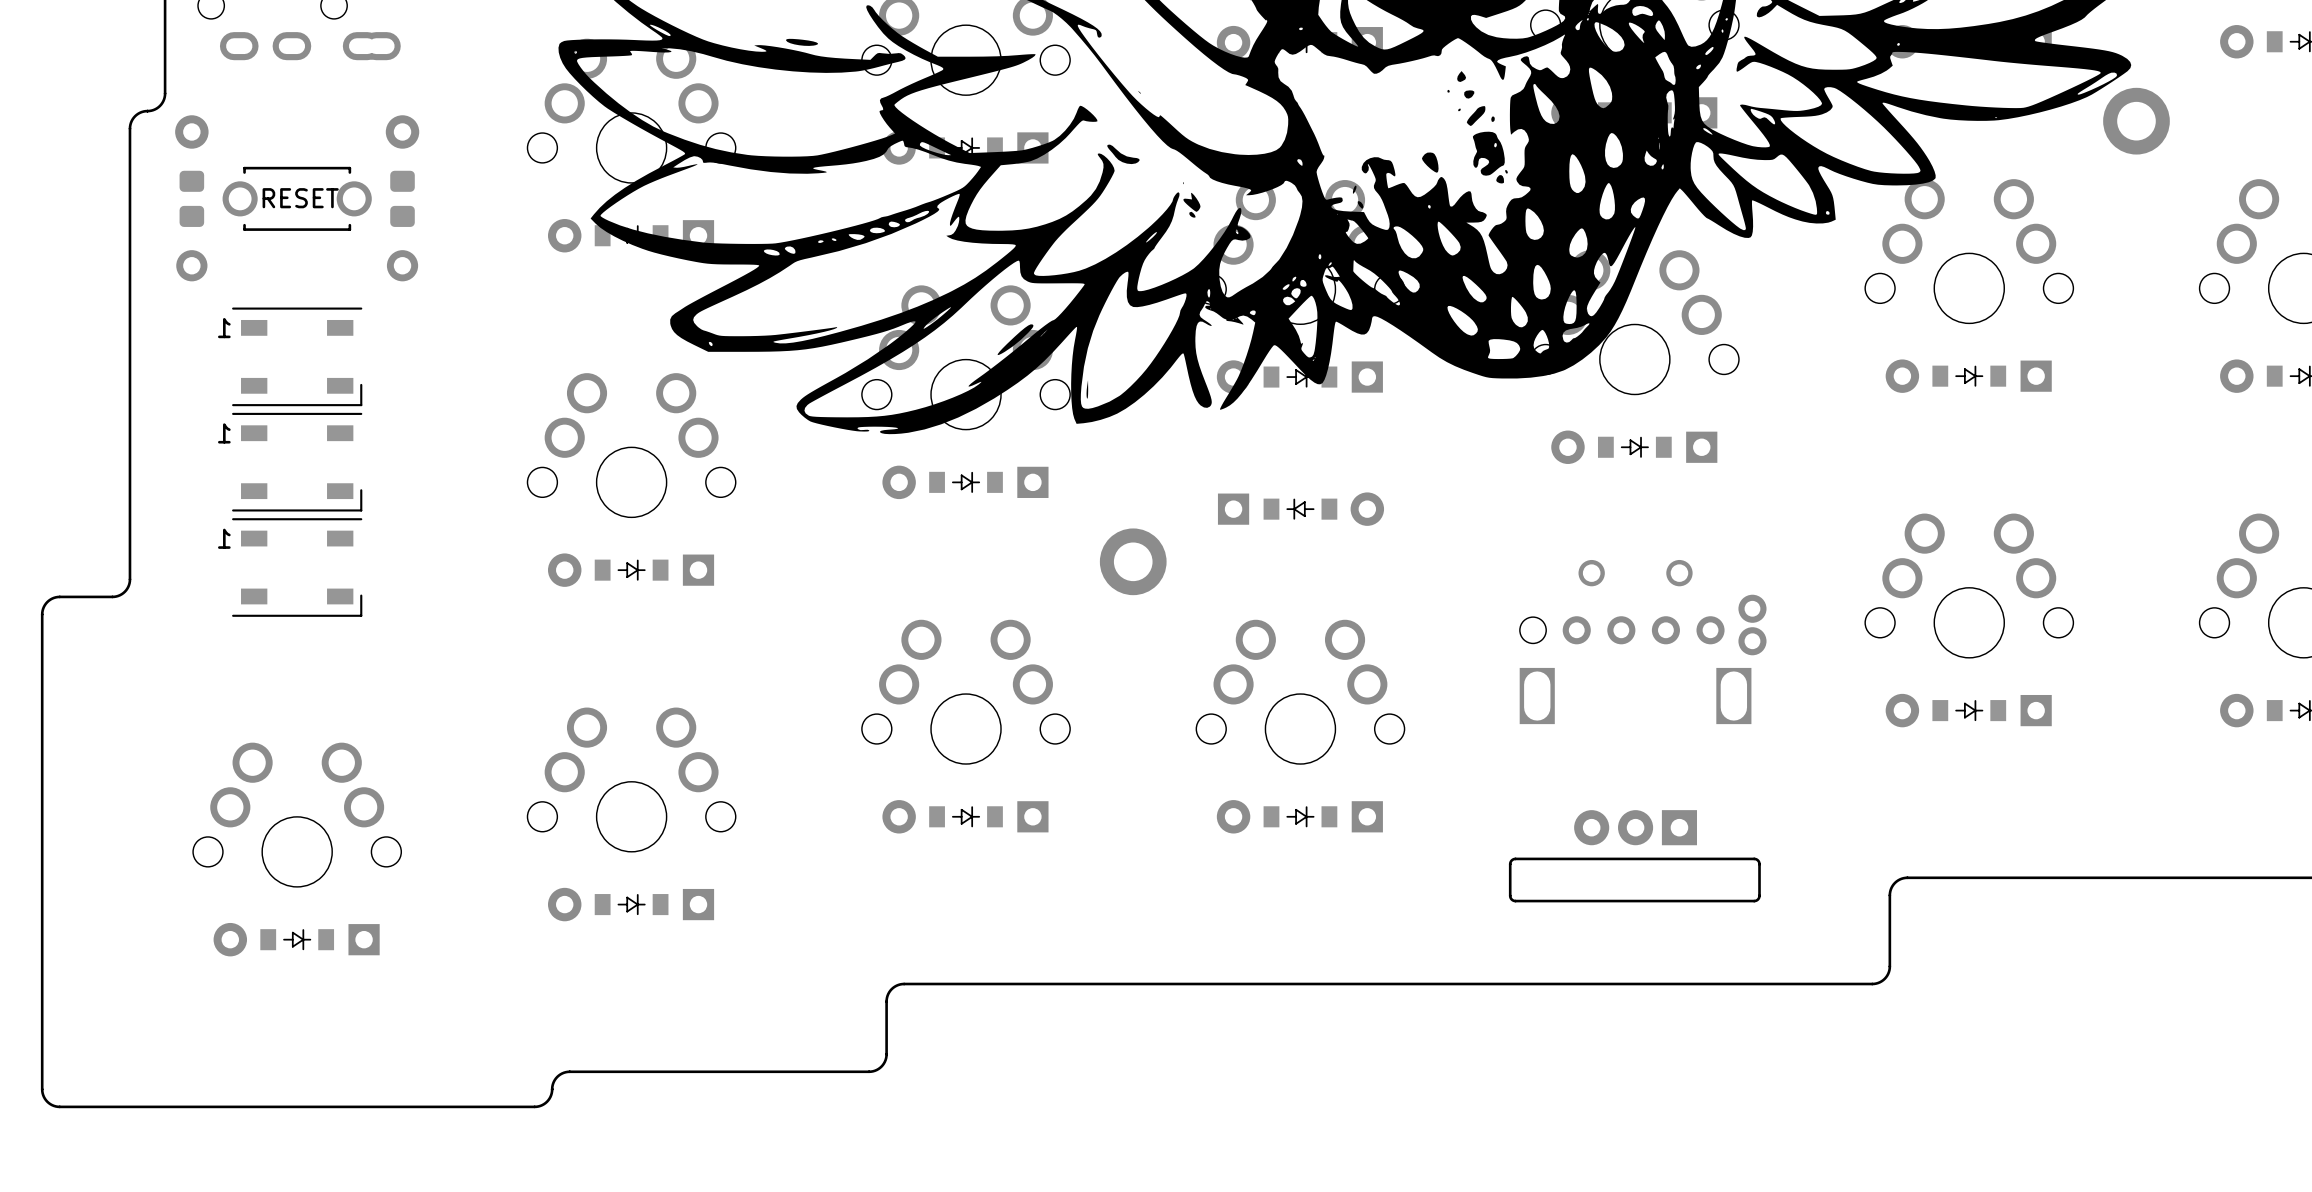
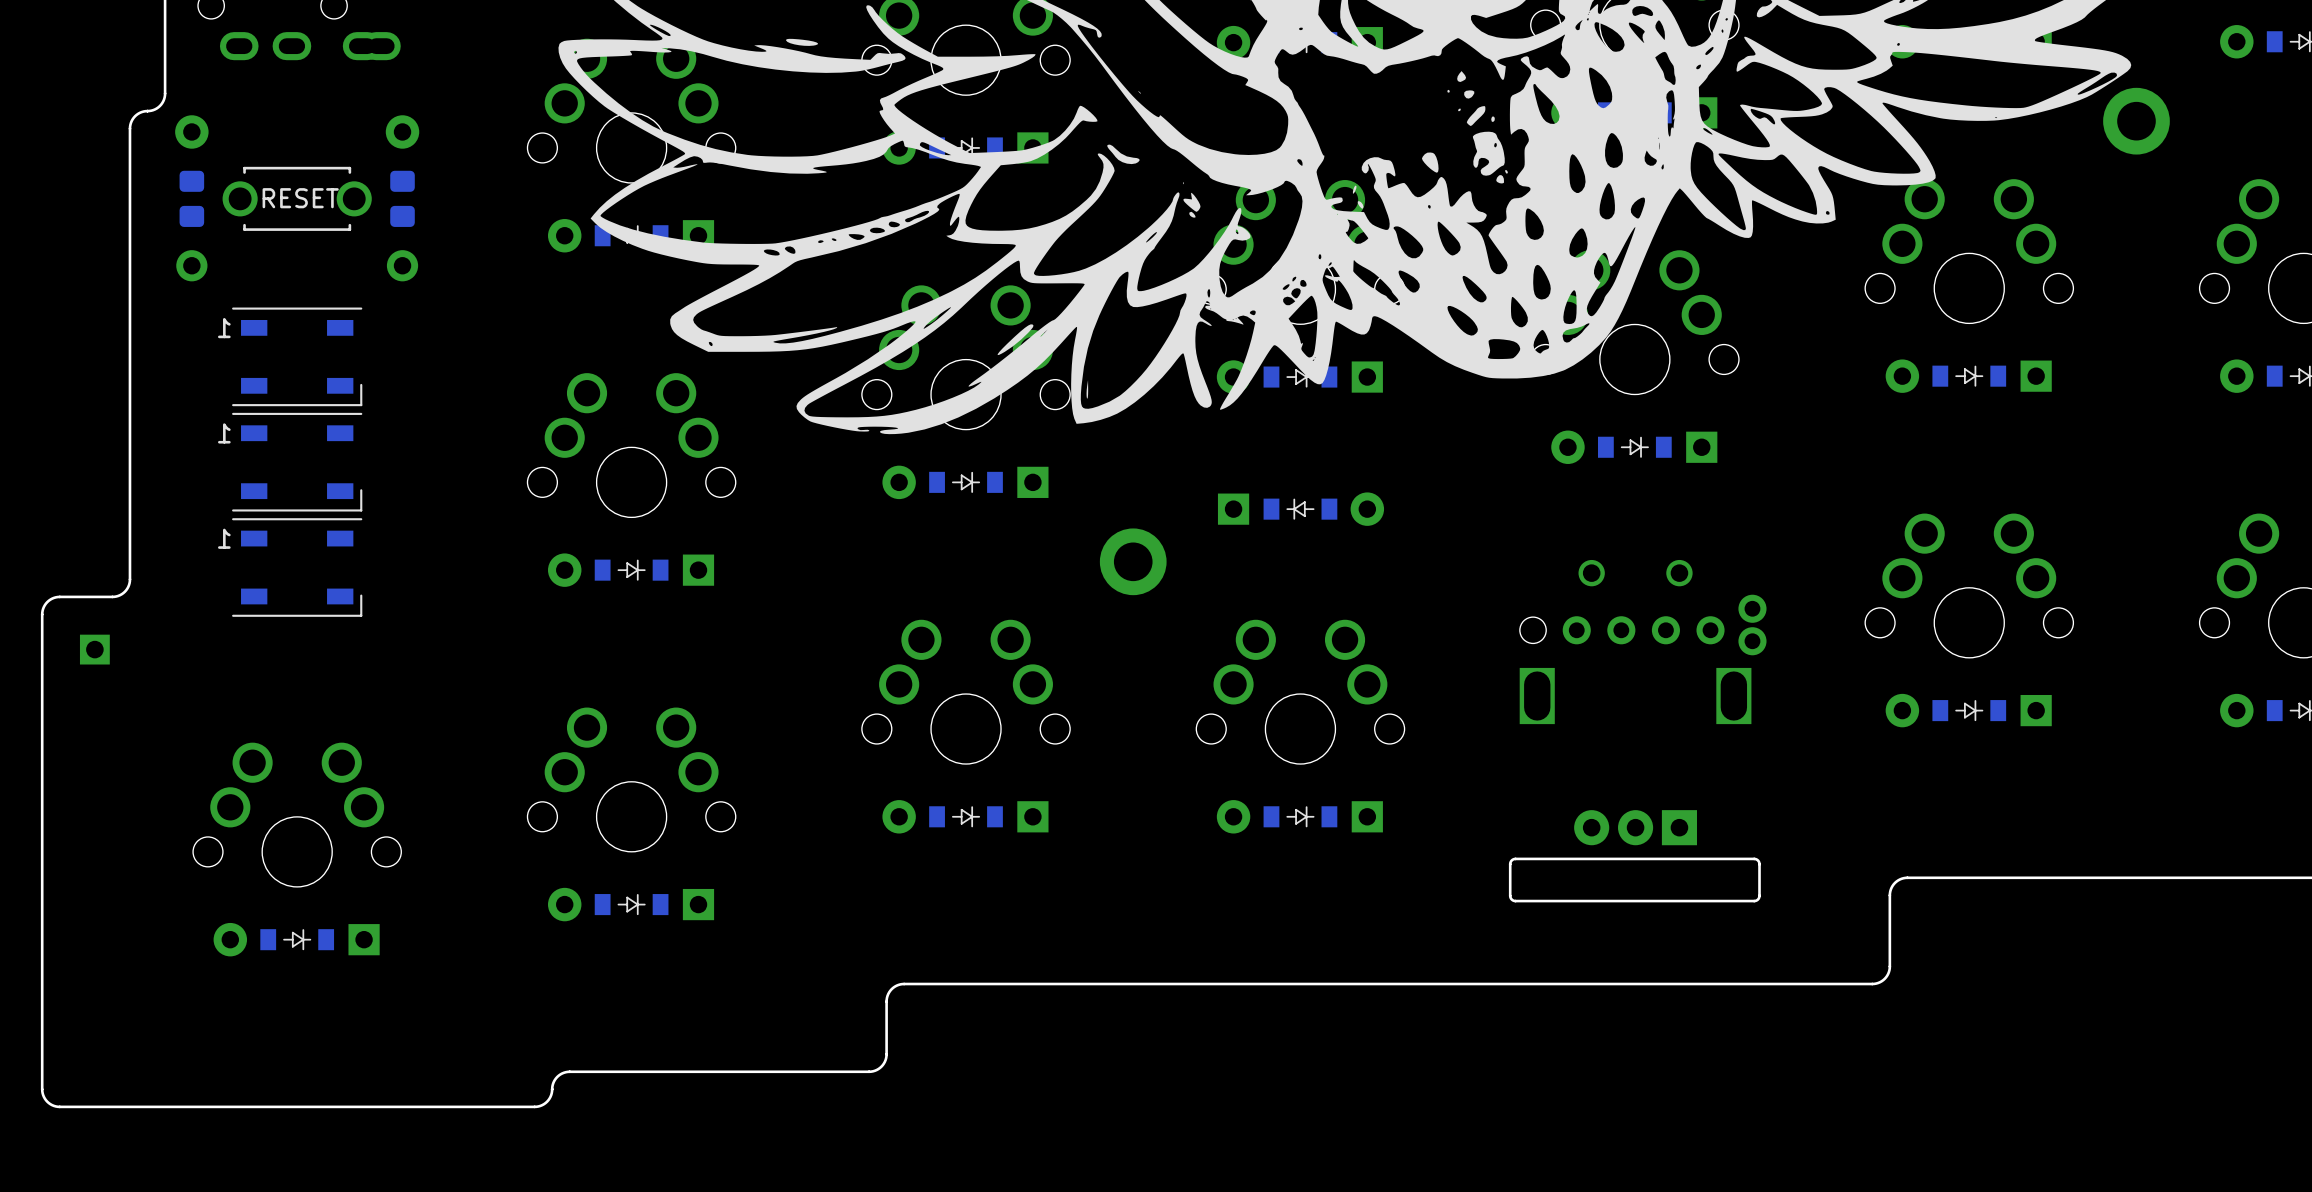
part: none -> (94, 649)

